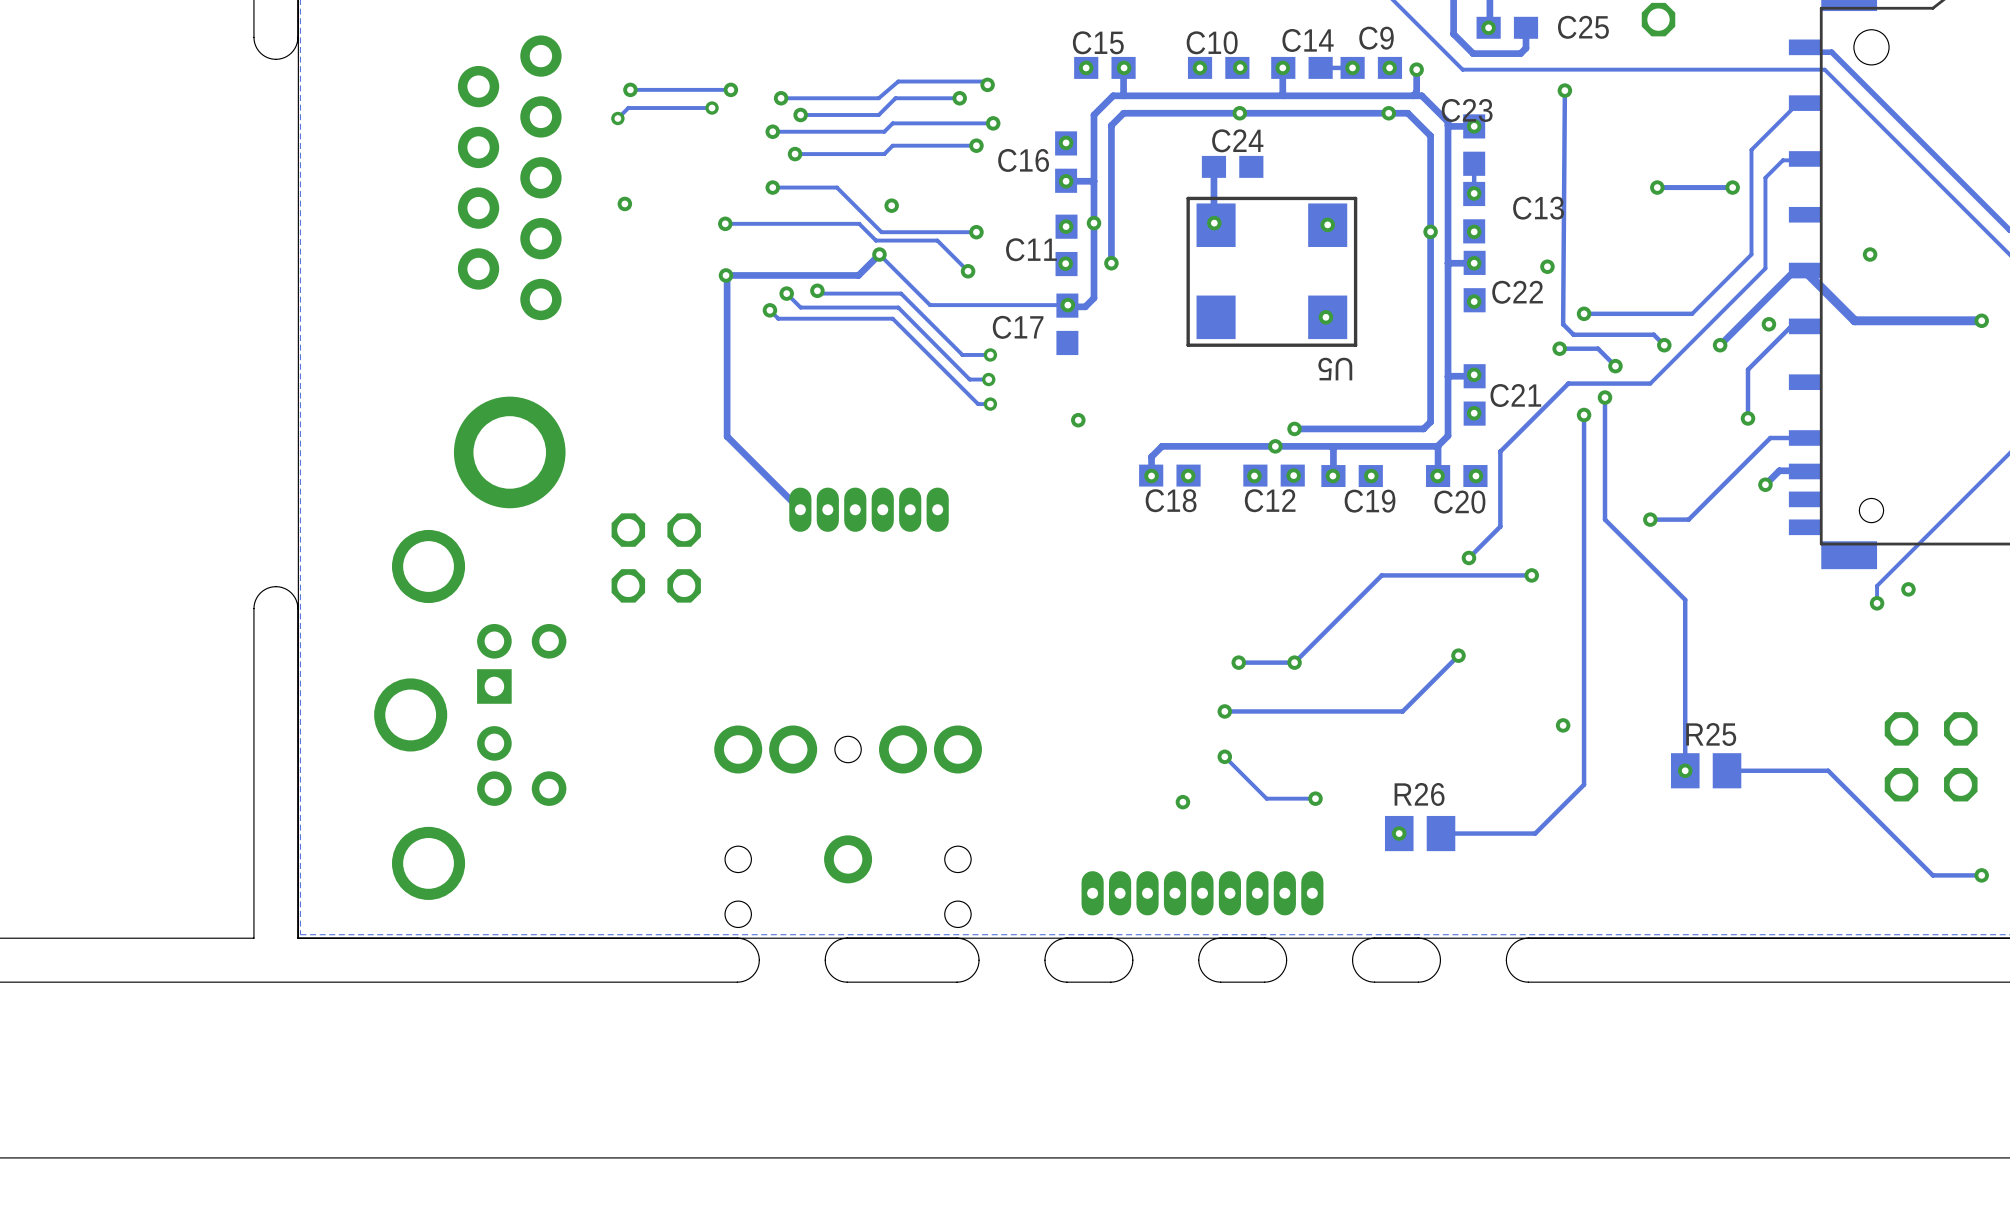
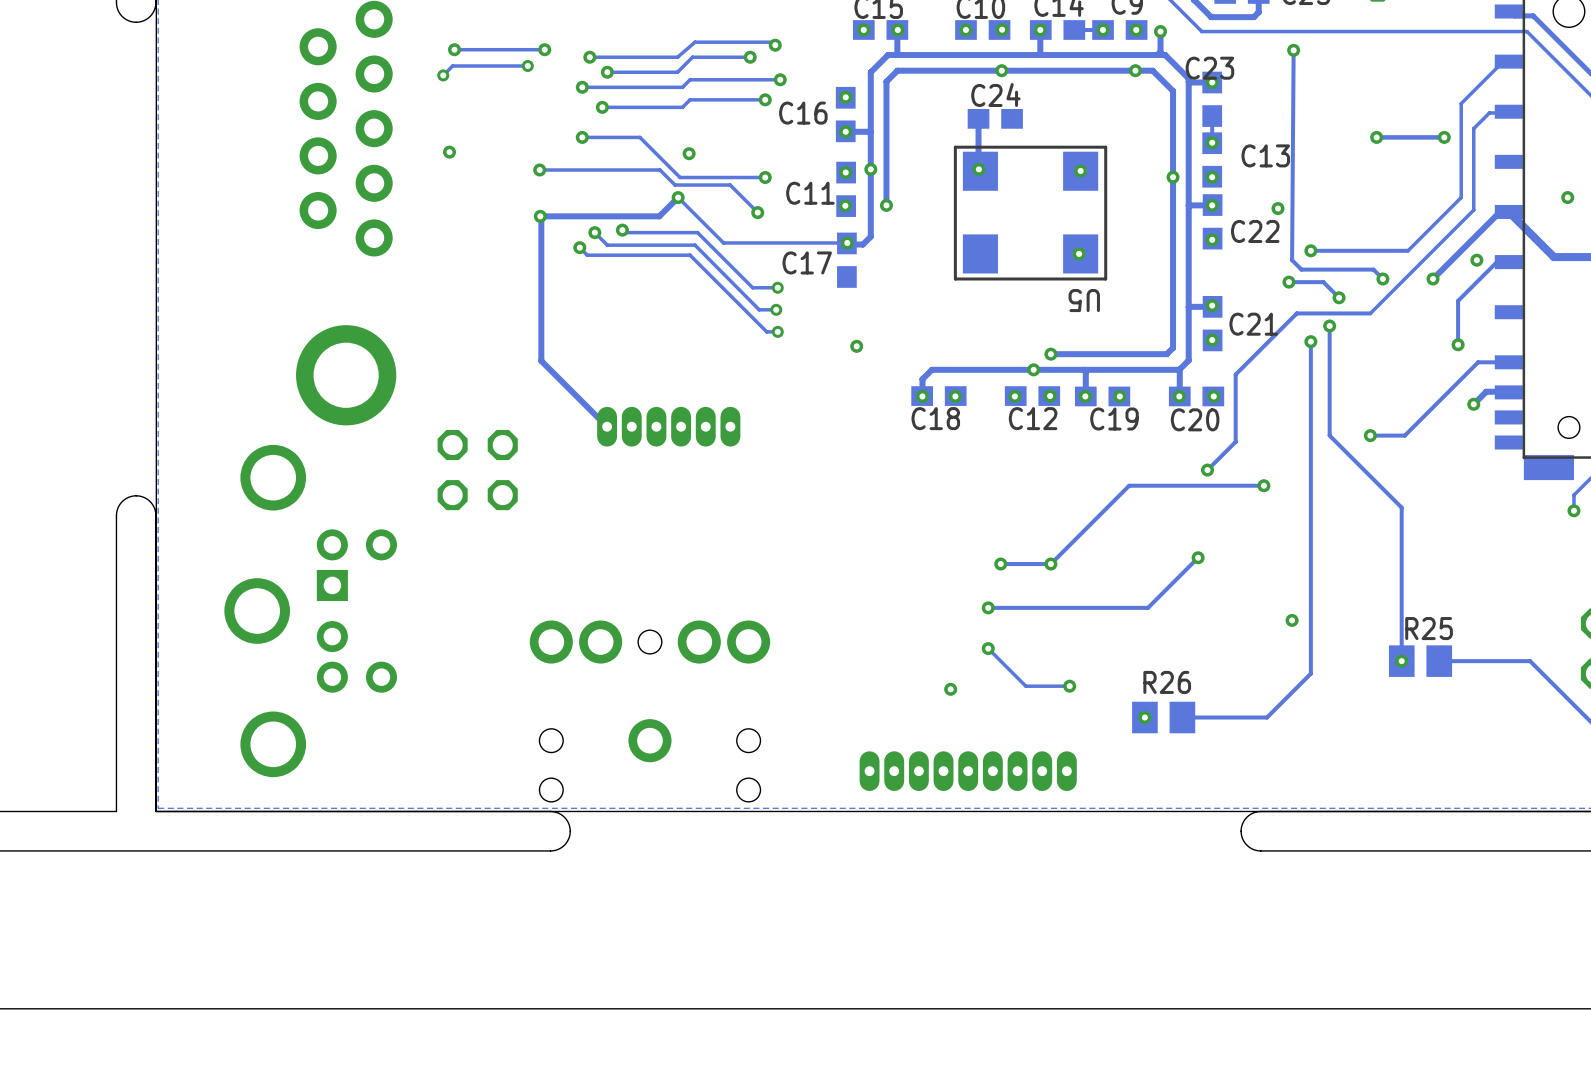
board edge: (957, 938) (841, 938) (833, 942) (828, 949) (825, 957) (825, 965) (833, 977) (844, 981) (962, 981) (974, 973) (978, 965) (978, 957) (976, 949) (970, 942) (957, 938) -> none
board edge: (1110, 938) (1066, 938) (1055, 941) (1049, 946) (1045, 954) (1045, 963) (1047, 971) (1053, 977) (1064, 981) (1110, 982) (1121, 979) (1131, 968) (1132, 954) (1124, 942) (1110, 938) -> none
board edge: (1264, 938) (1220, 938) (1209, 941) (1203, 946) (1199, 954) (1198, 963) (1201, 971) (1207, 977) (1217, 981) (1264, 982) (1275, 979) (1284, 968) (1285, 954) (1278, 942) (1264, 938) -> none
board edge: (1418, 938) (1374, 938) (1363, 941) (1357, 946) (1353, 954) (1352, 963) (1355, 971) (1361, 977) (1371, 981) (1418, 982) (1429, 979) (1438, 968) (1439, 954) (1431, 942) (1418, 938) -> none

